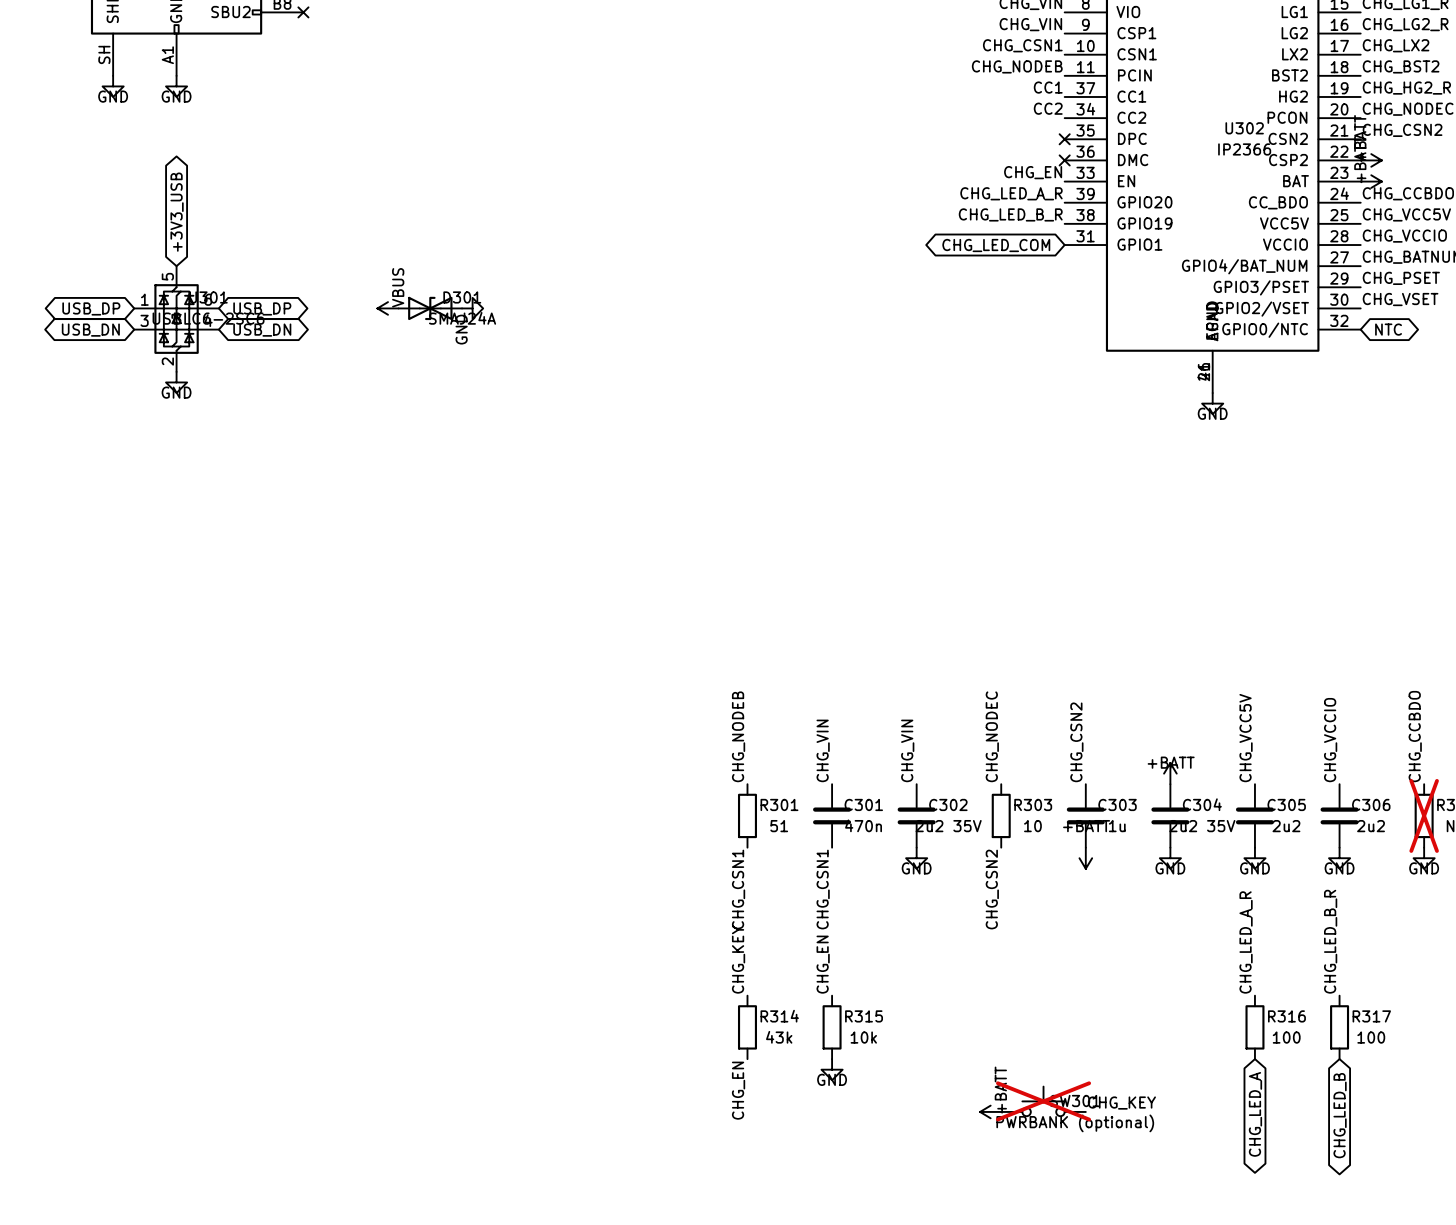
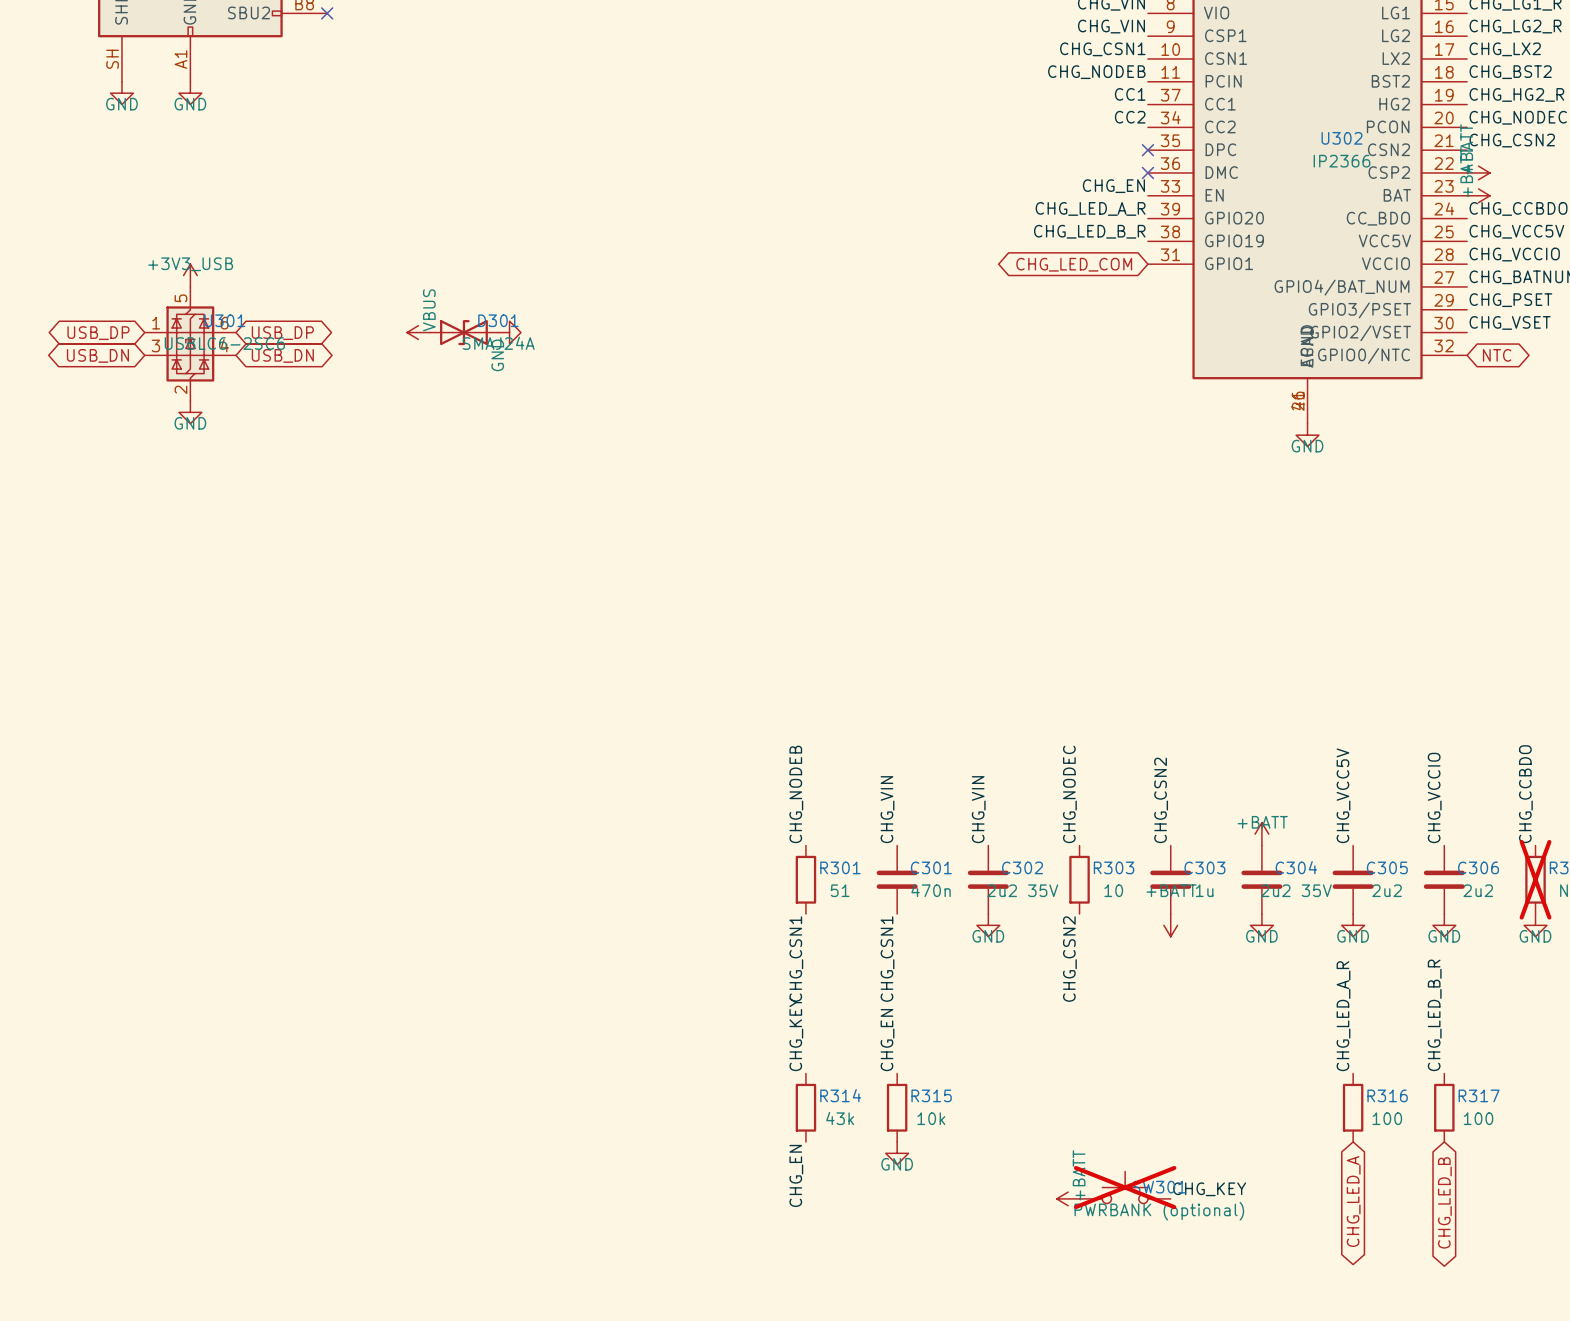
global label: +3V3_USB (177, 212) -> none
power symbol: none -> +3V3_USB (190, 275)

